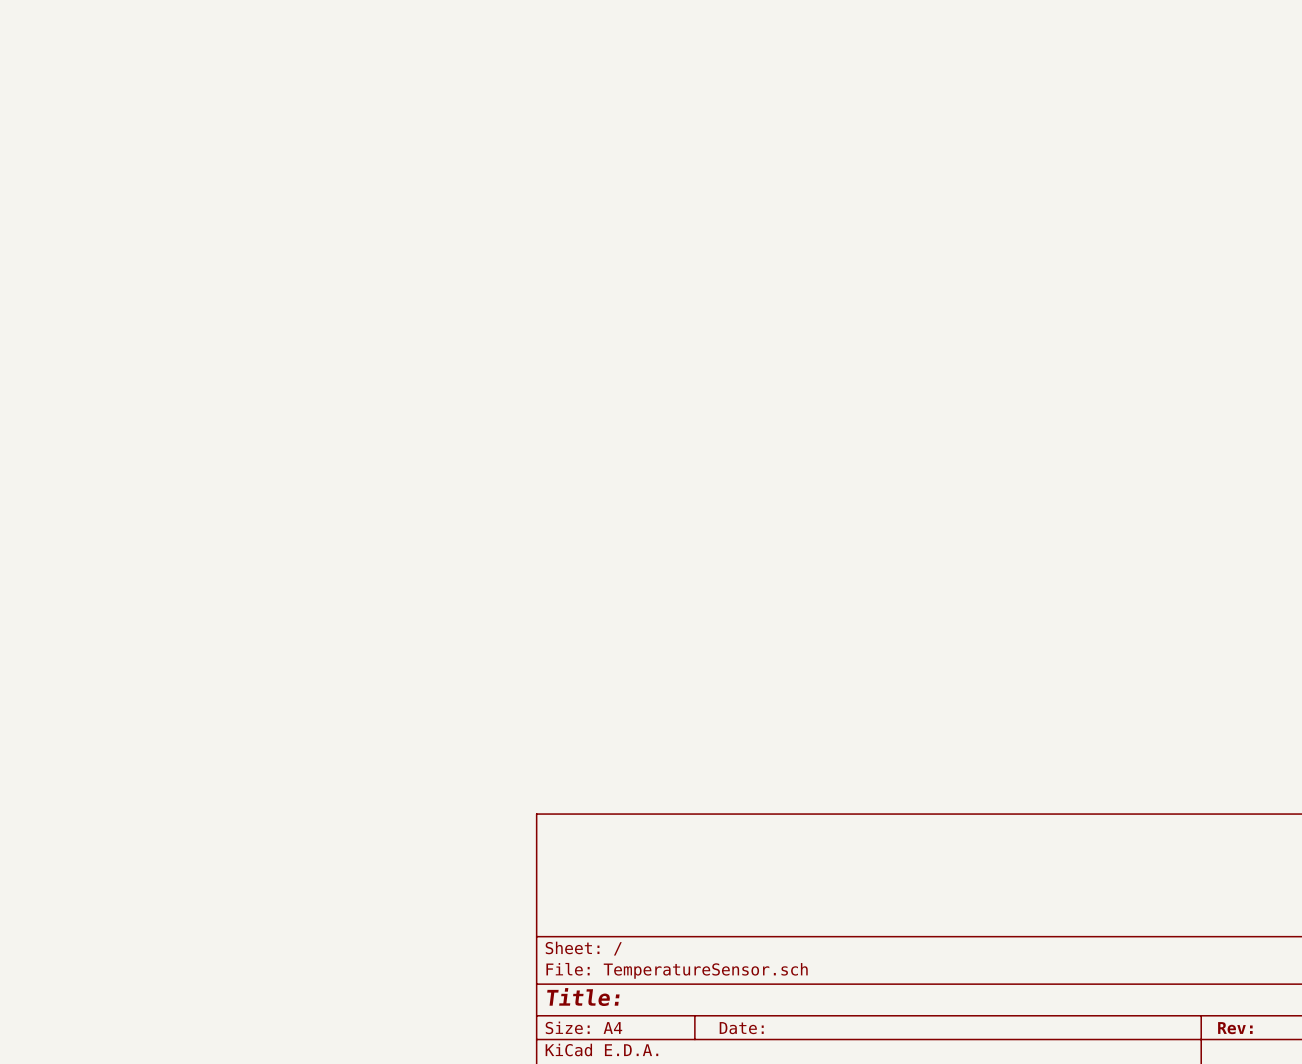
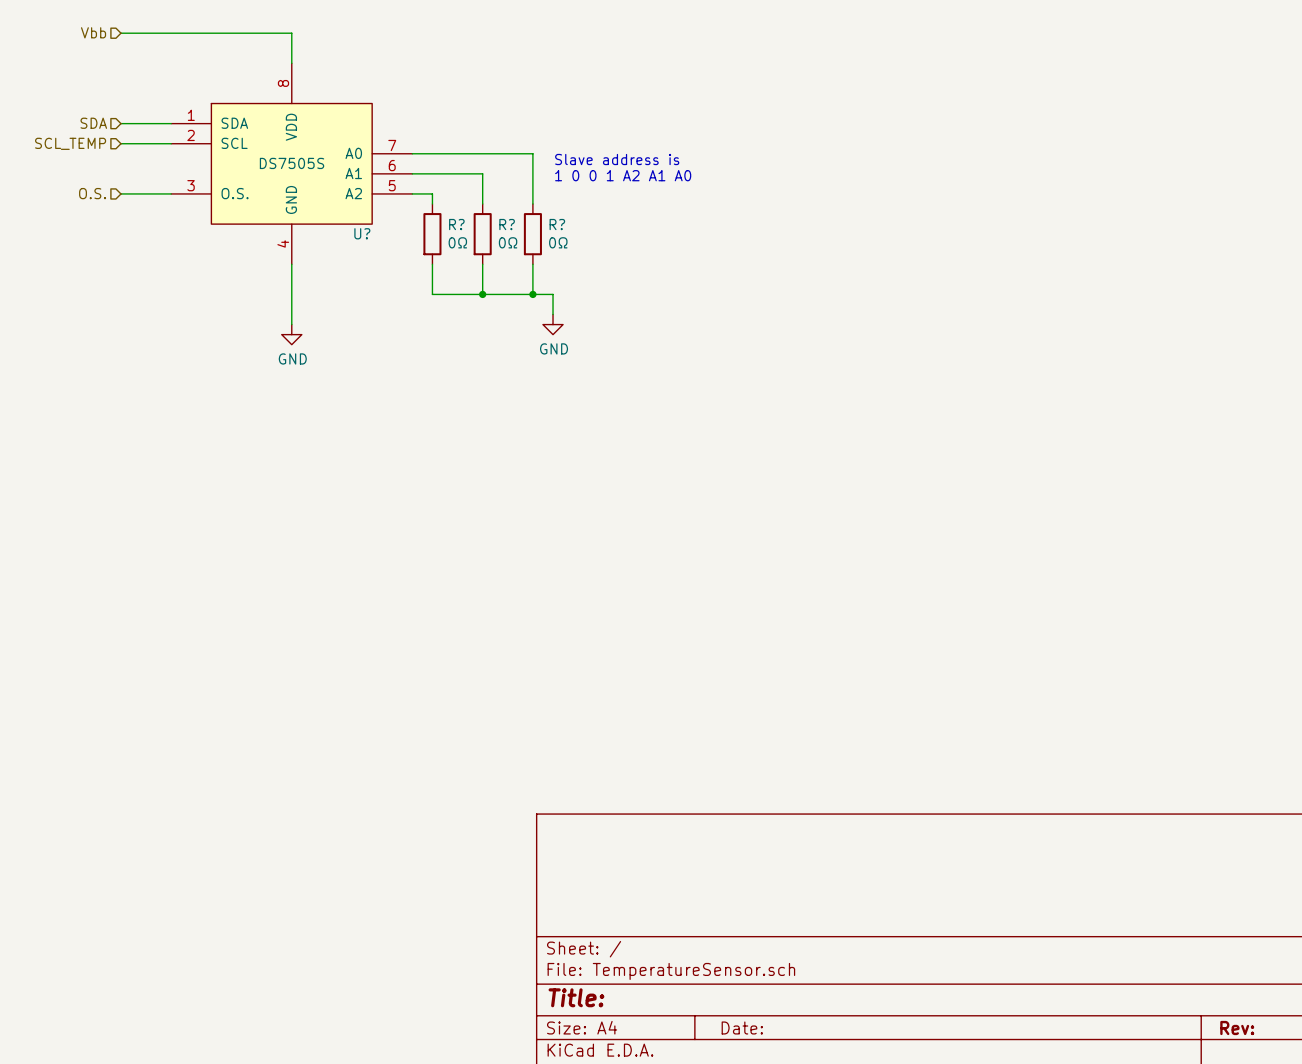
hierarchical label: none -> Vbb (93, 32)
wire: none -> (120, 33) (291, 33) (291, 63)
hierarchical label: none -> SDA (93, 123)
wire: none -> (120, 123) (171, 123)
wire: none -> (120, 143) (171, 143)
hierarchical label: none -> SCL_TEMP (70, 143)
wire: none -> (412, 153) (532, 153) (532, 204)
text: none -> Slave address is (617, 159)
U?: none -> DS7505S (291, 163)
wire: none -> (412, 173) (482, 173) (482, 204)
text: none -> 1 0 0 1 A2 A1 A0 (623, 175)
hierarchical label: none -> O.S. (92, 193)
wire: none -> (120, 193) (171, 193)
wire: none -> (412, 193) (432, 193) (432, 204)
R?: none -> 0Ω (432, 234)
R?: none -> 0Ω (482, 234)
R?: none -> 0Ω (532, 234)
wire: none -> (291, 264) (291, 324)
wire: none -> (432, 264) (432, 294) (553, 294) (553, 314)
wire: none -> (482, 264) (482, 294)
wire: none -> (532, 264) (532, 294)
junction: none -> (482, 294)
junction: none -> (532, 294)
power symbol: none -> GND (553, 324)
power symbol: none -> GND (291, 334)

